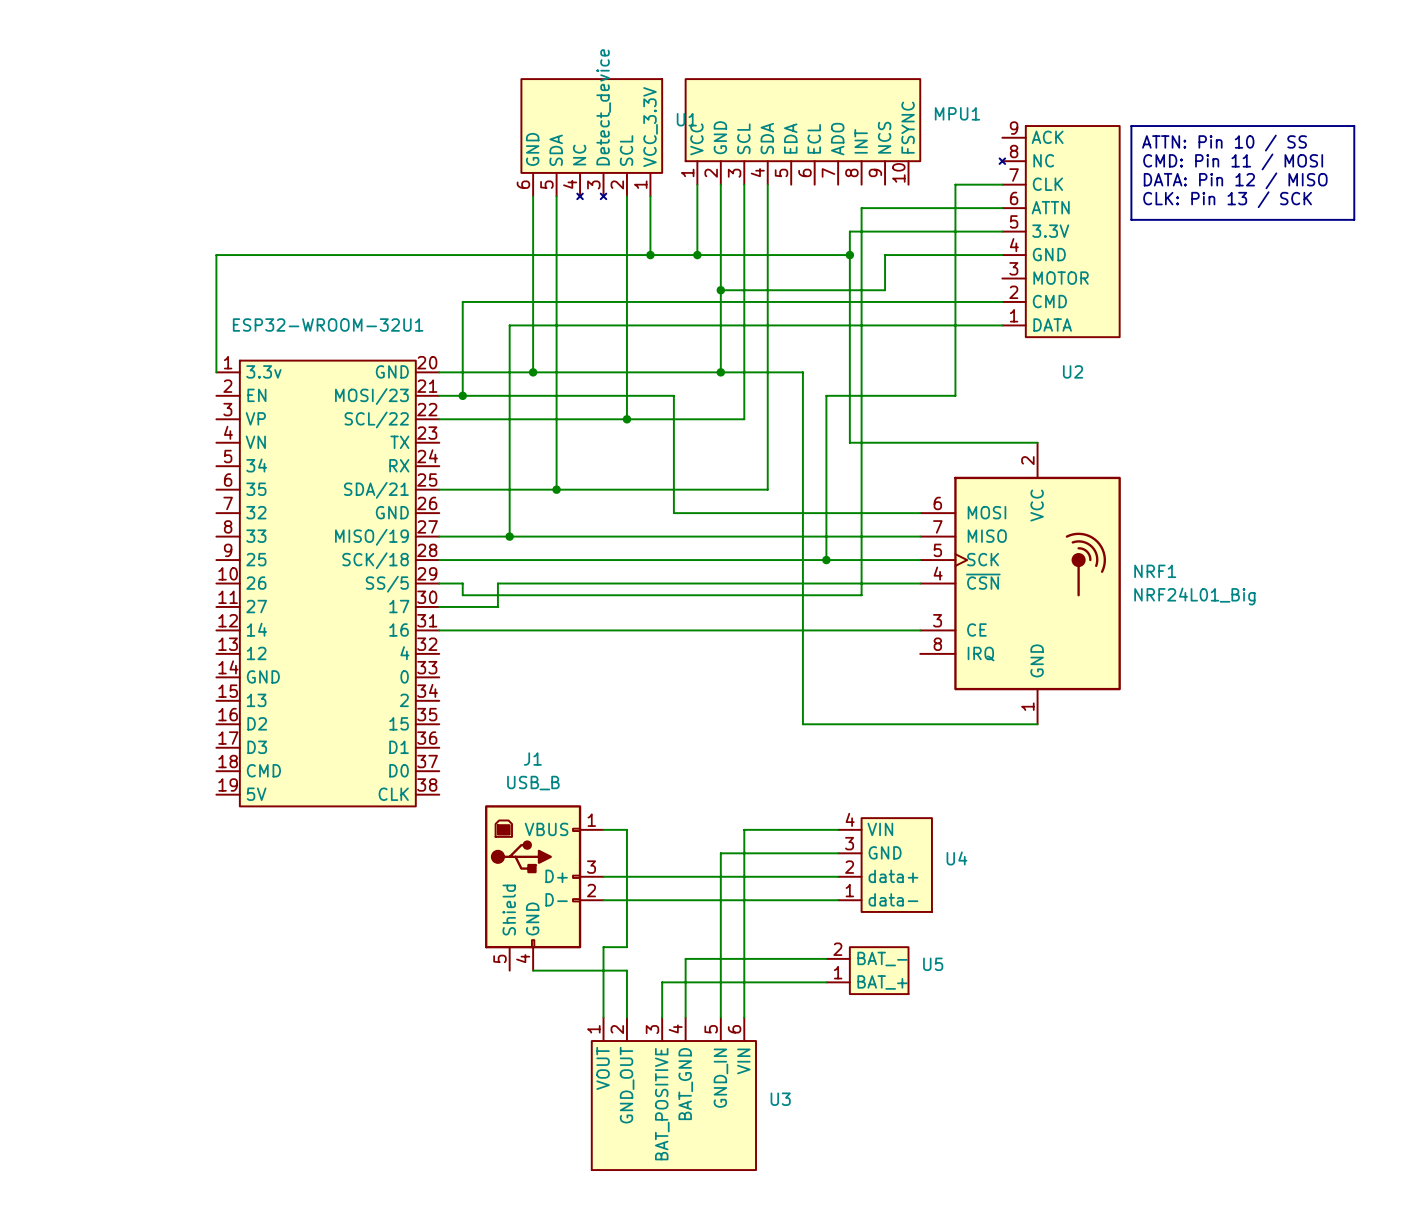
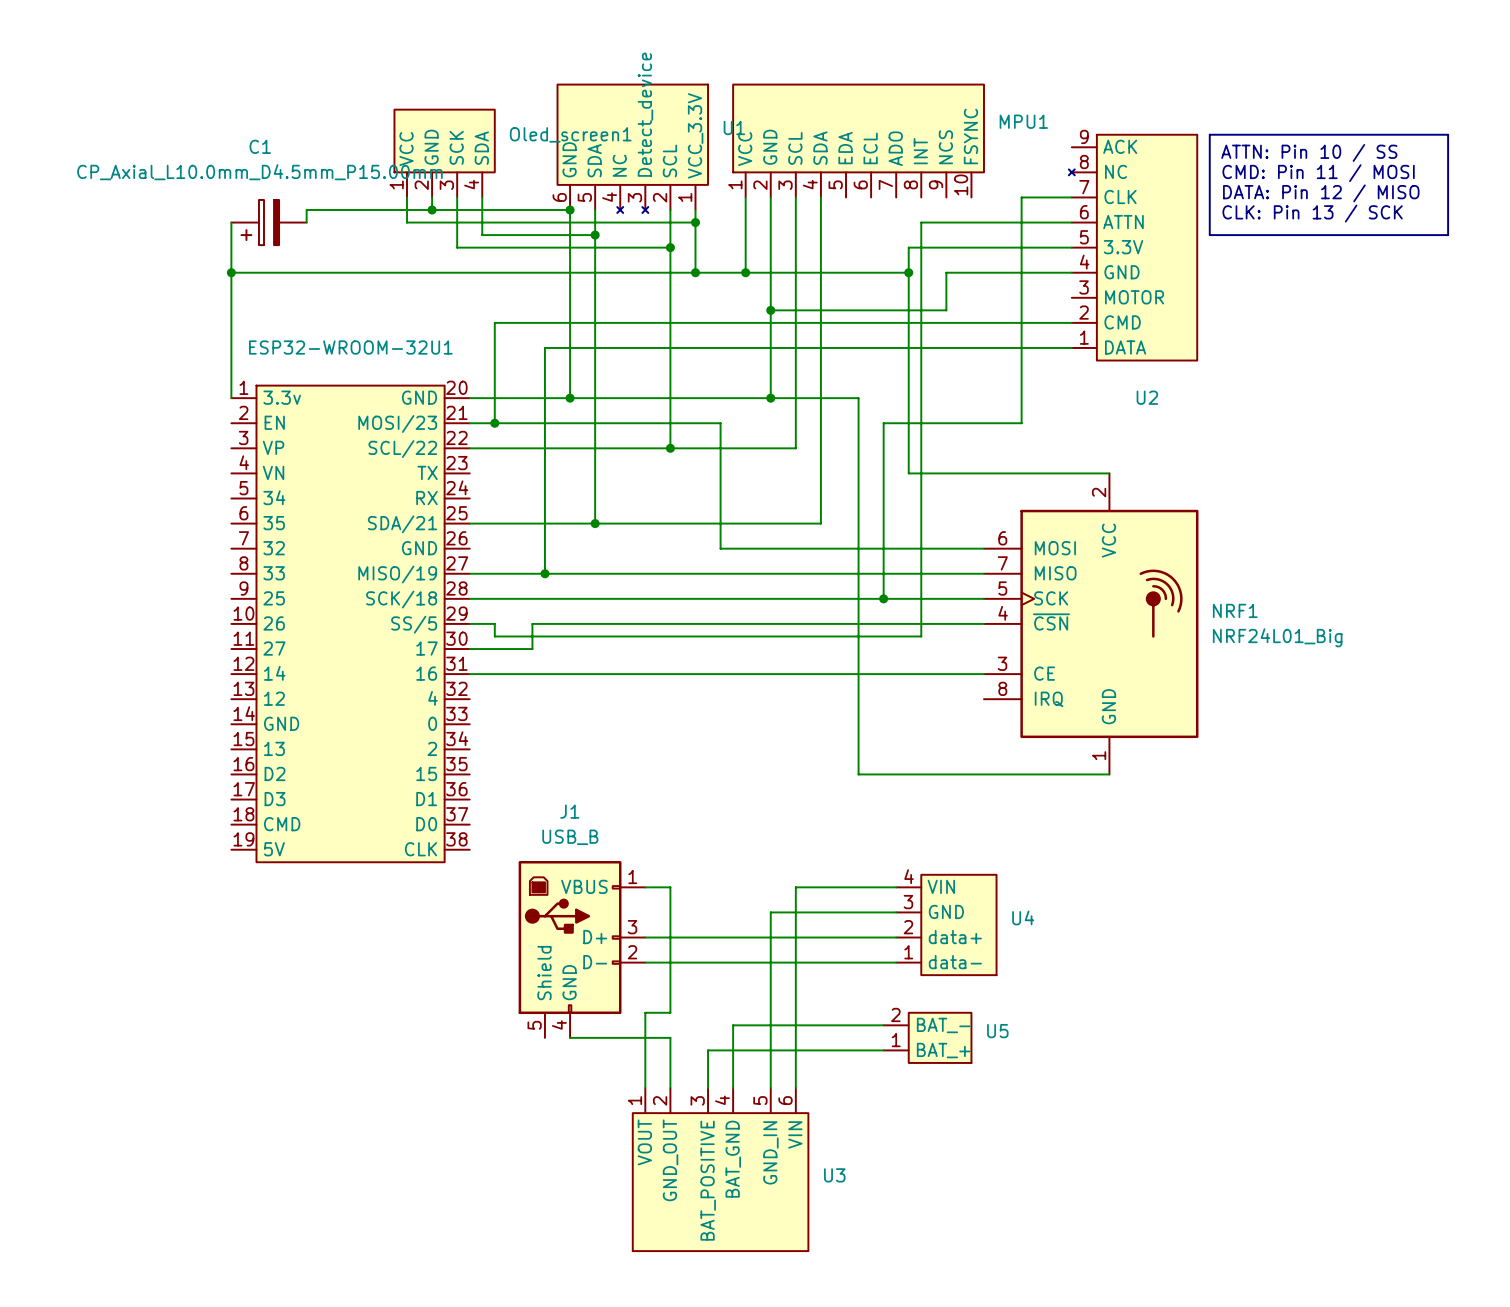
Oled_screen1: none -> (444, 153)
wire: none -> (407, 197) (407, 222) (695, 222)
wire: none -> (432, 197) (432, 210)
wire: none -> (457, 197) (457, 247) (670, 247)
wire: none -> (482, 197) (482, 235) (595, 235)
junction: none -> (432, 210)
wire: none -> (570, 210) (306, 210) (306, 222)
junction: none -> (570, 210)
wire: none -> (231, 222) (231, 272)
C1: none -> CP_Axial_L10.0mm_D4.5mm_P15.00mm (269, 222)
junction: none -> (695, 222)
junction: none -> (595, 235)
junction: none -> (670, 247)
junction: none -> (231, 272)

